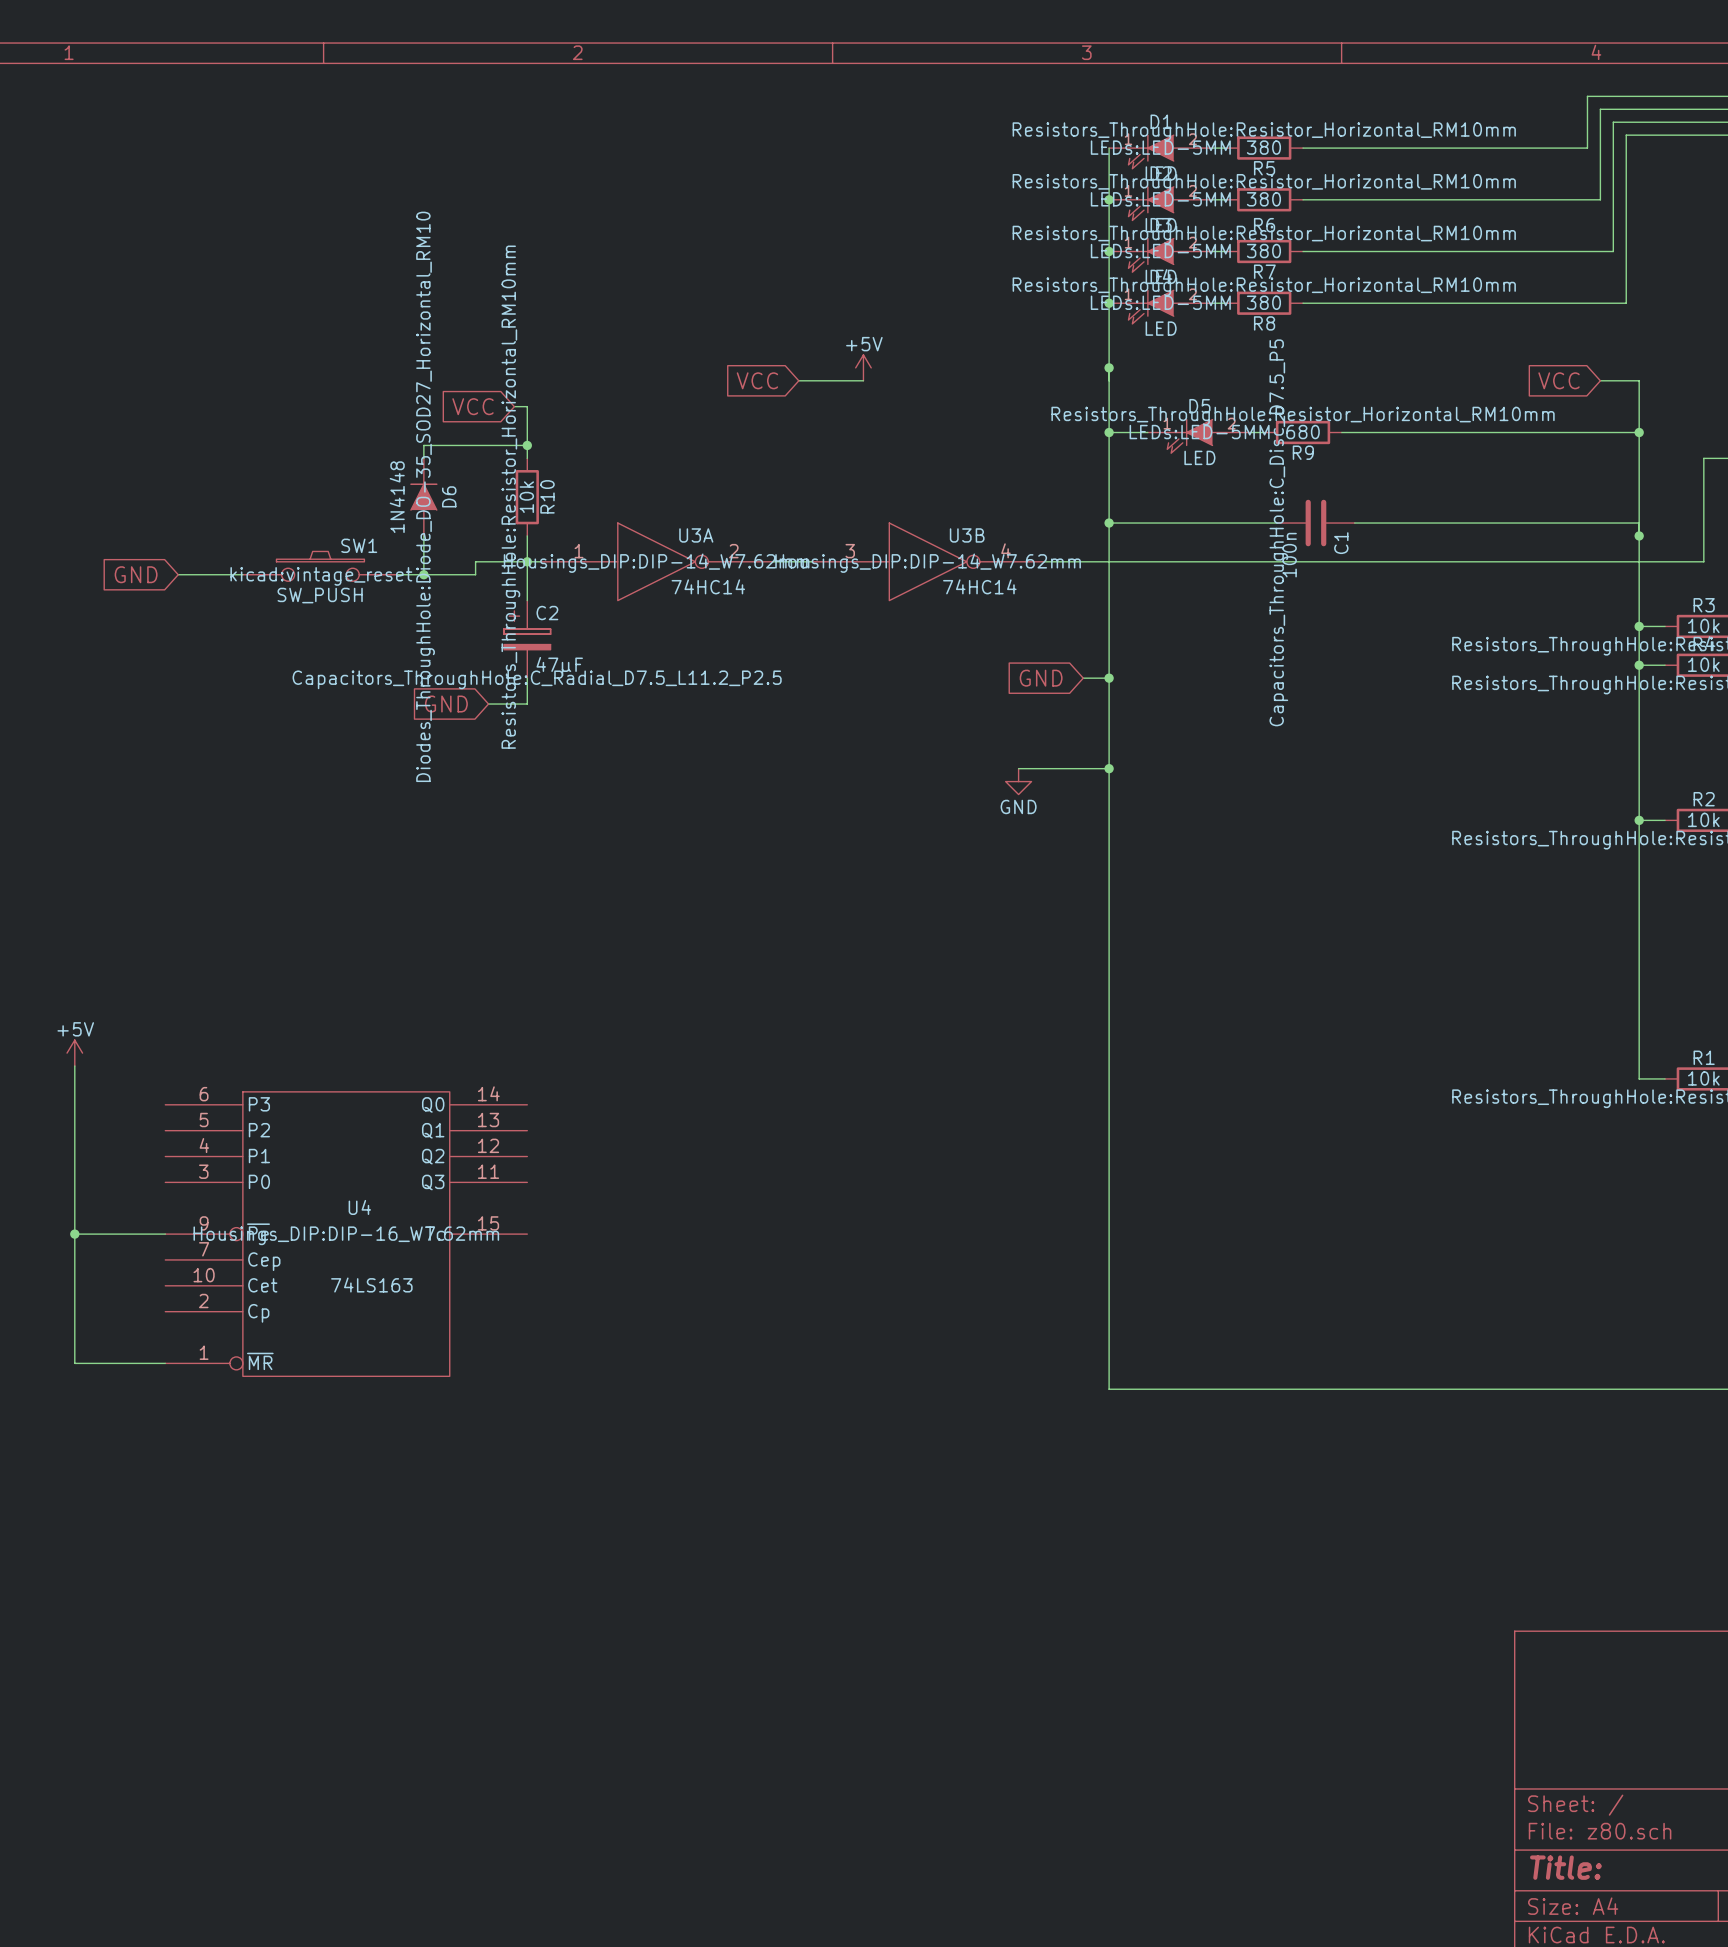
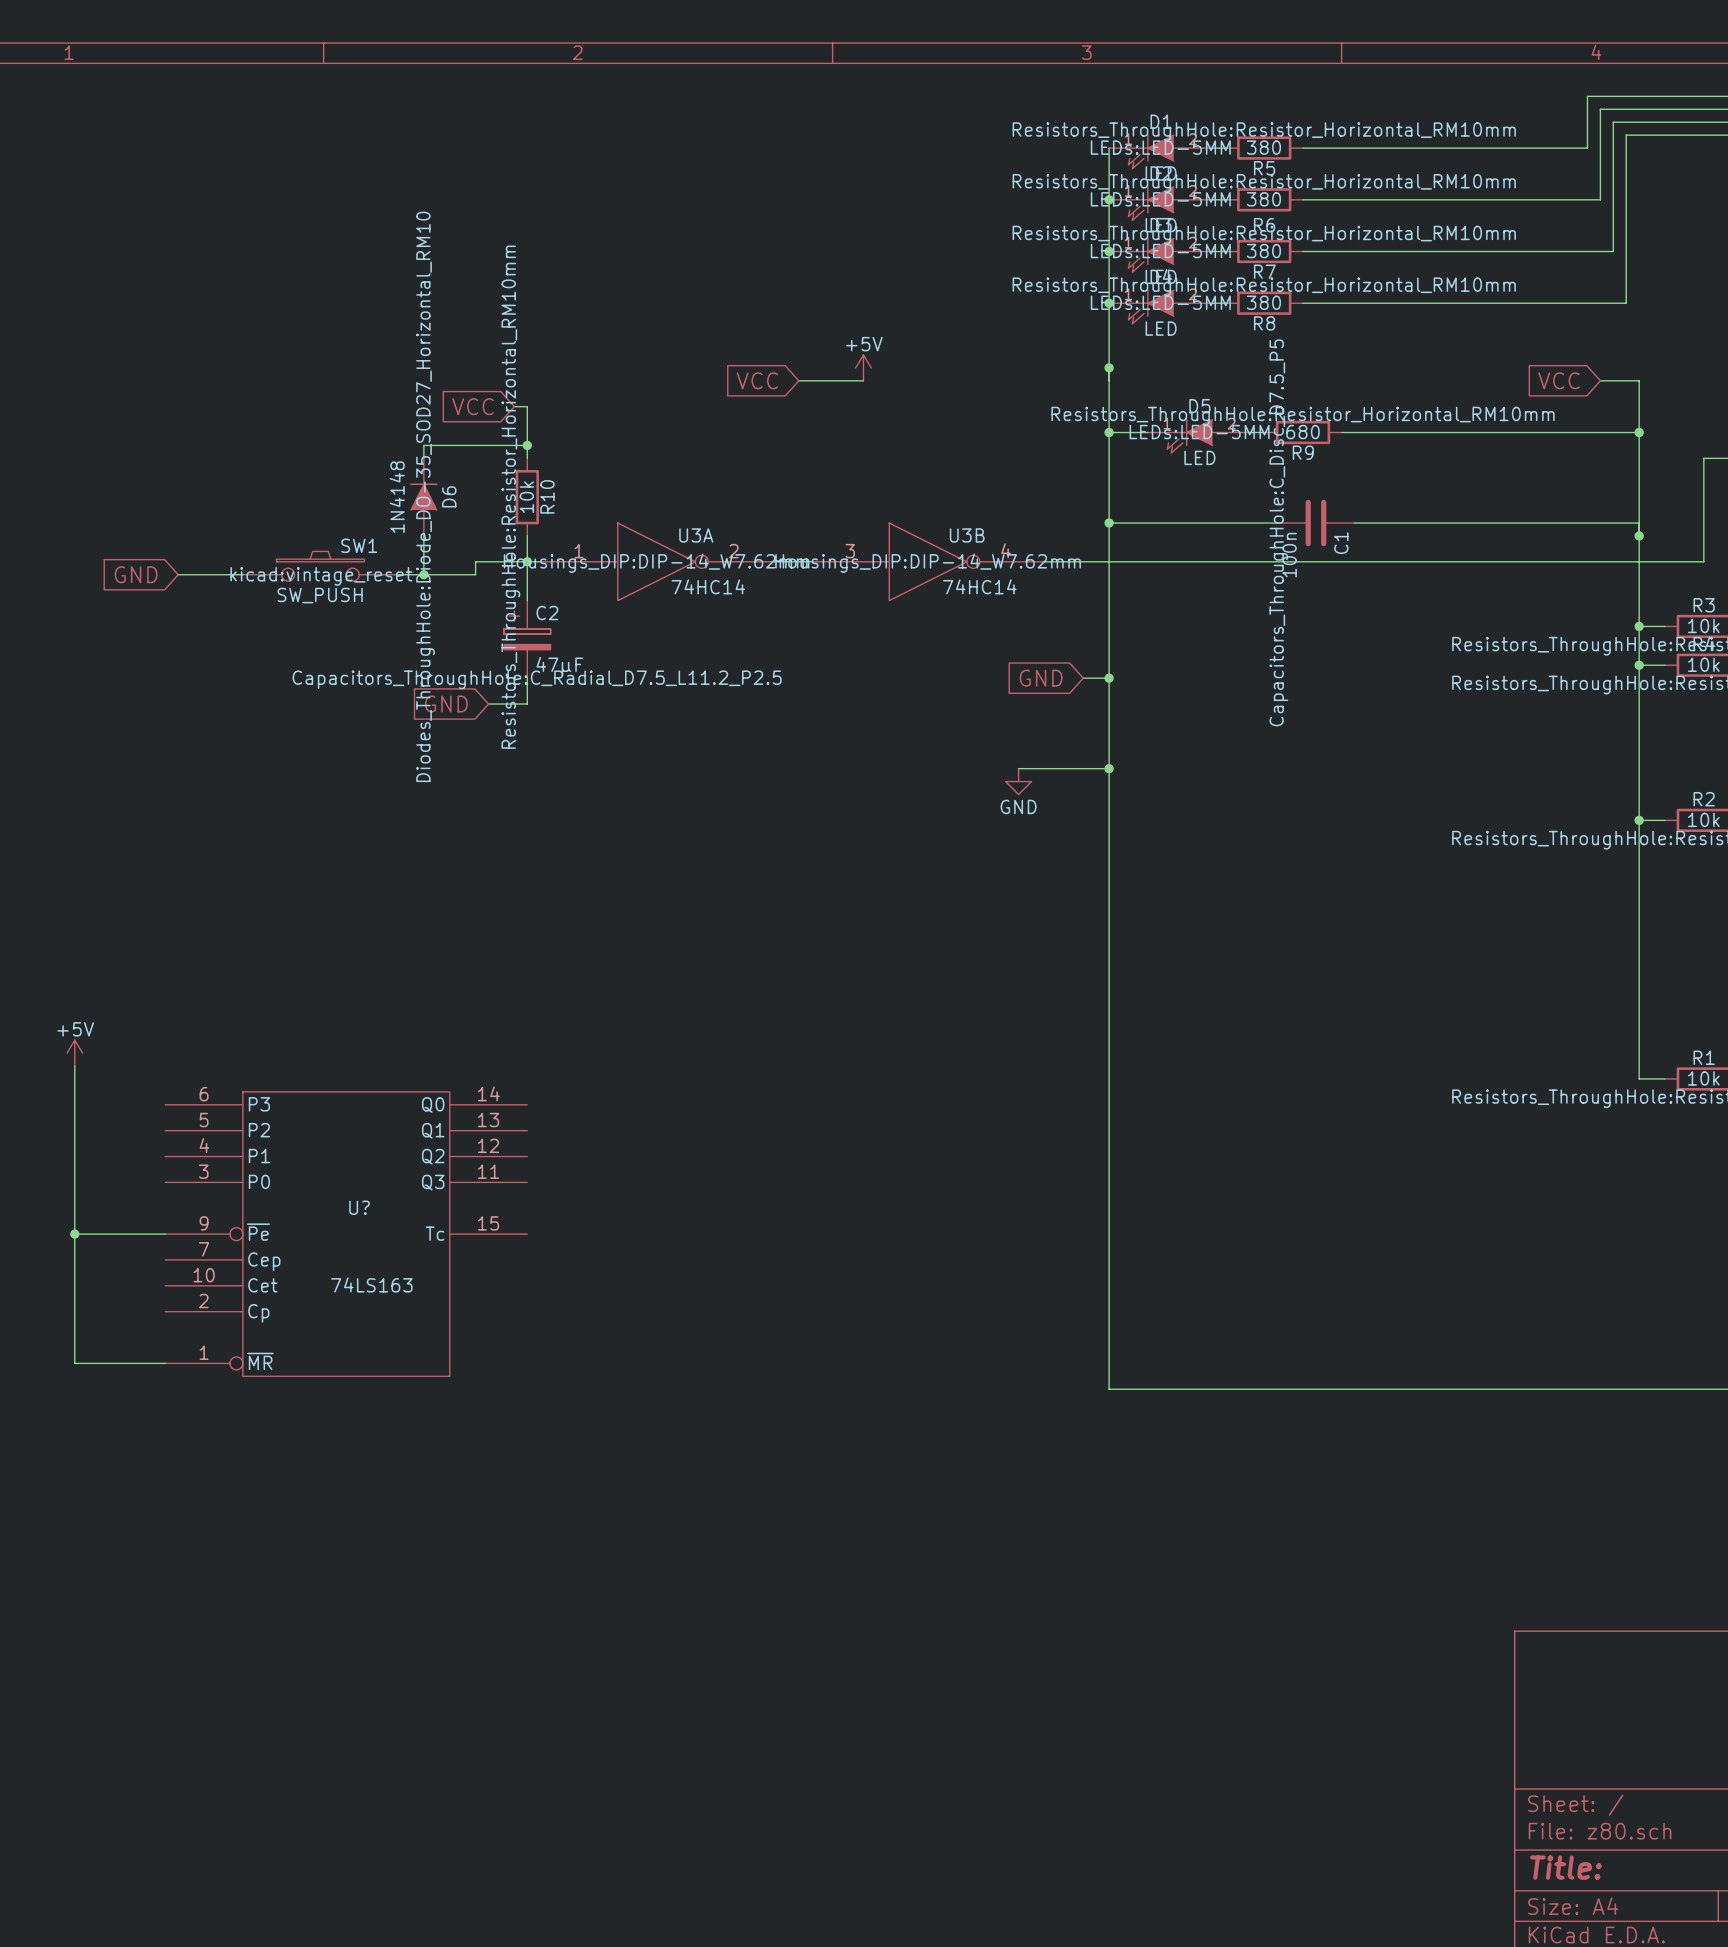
U4 name: U4 (359, 1207) -> U? (359, 1207)
U4 text: Housings_DIP:DIP-16_W7.62mm (346, 1235) -> none

